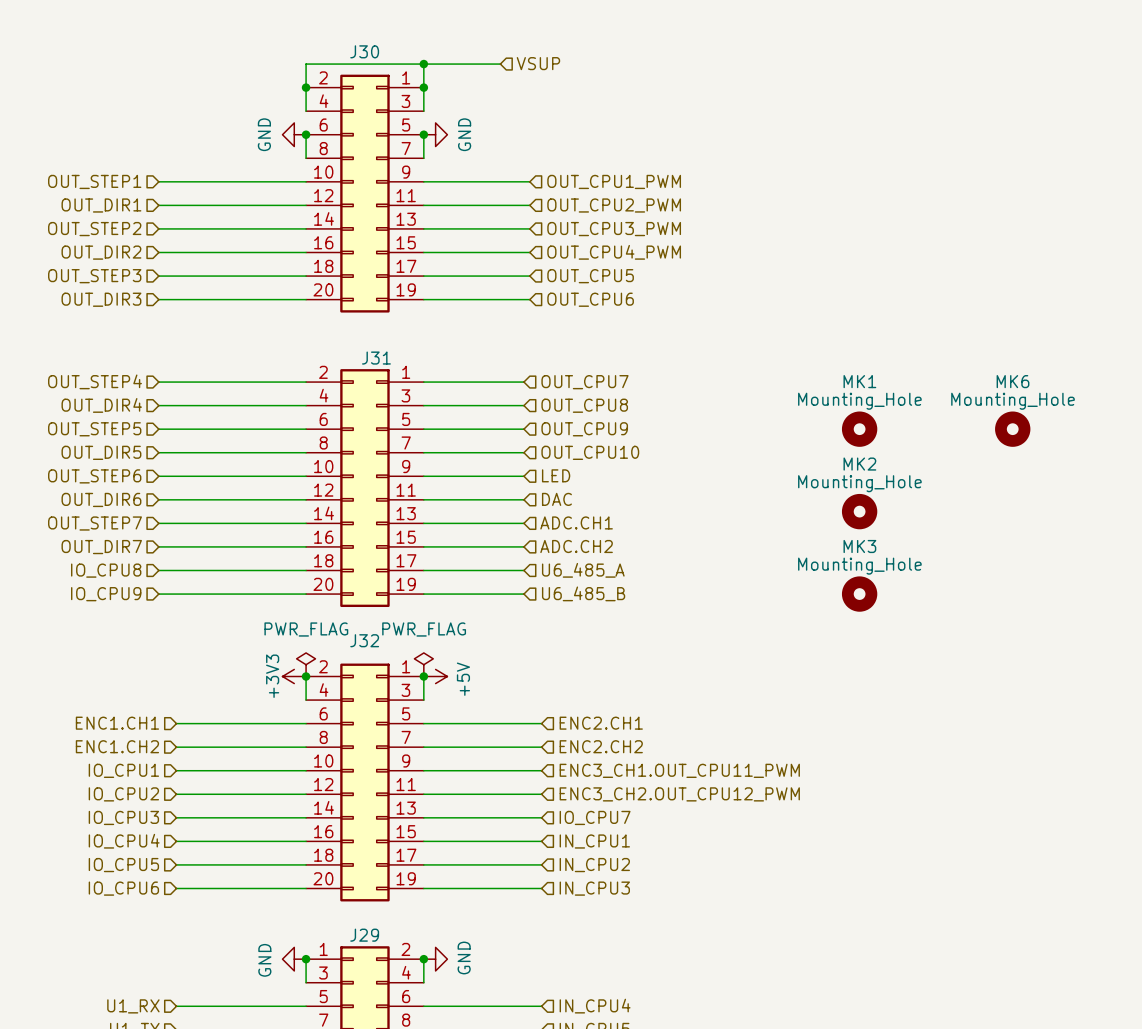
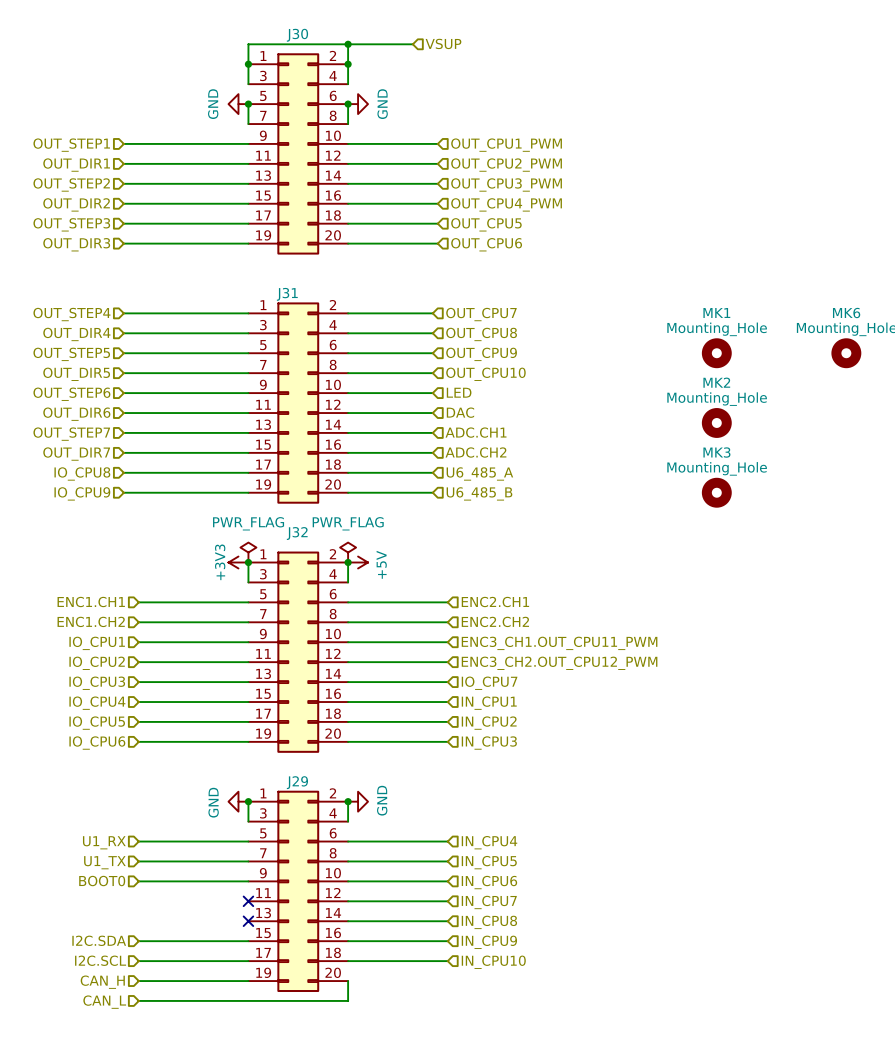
J30 flip: as is (364, 193) -> left-right (298, 153)
J31 flip: as is (364, 488) -> left-right (298, 403)
J32 flip: as is (364, 782) -> left-right (298, 652)

